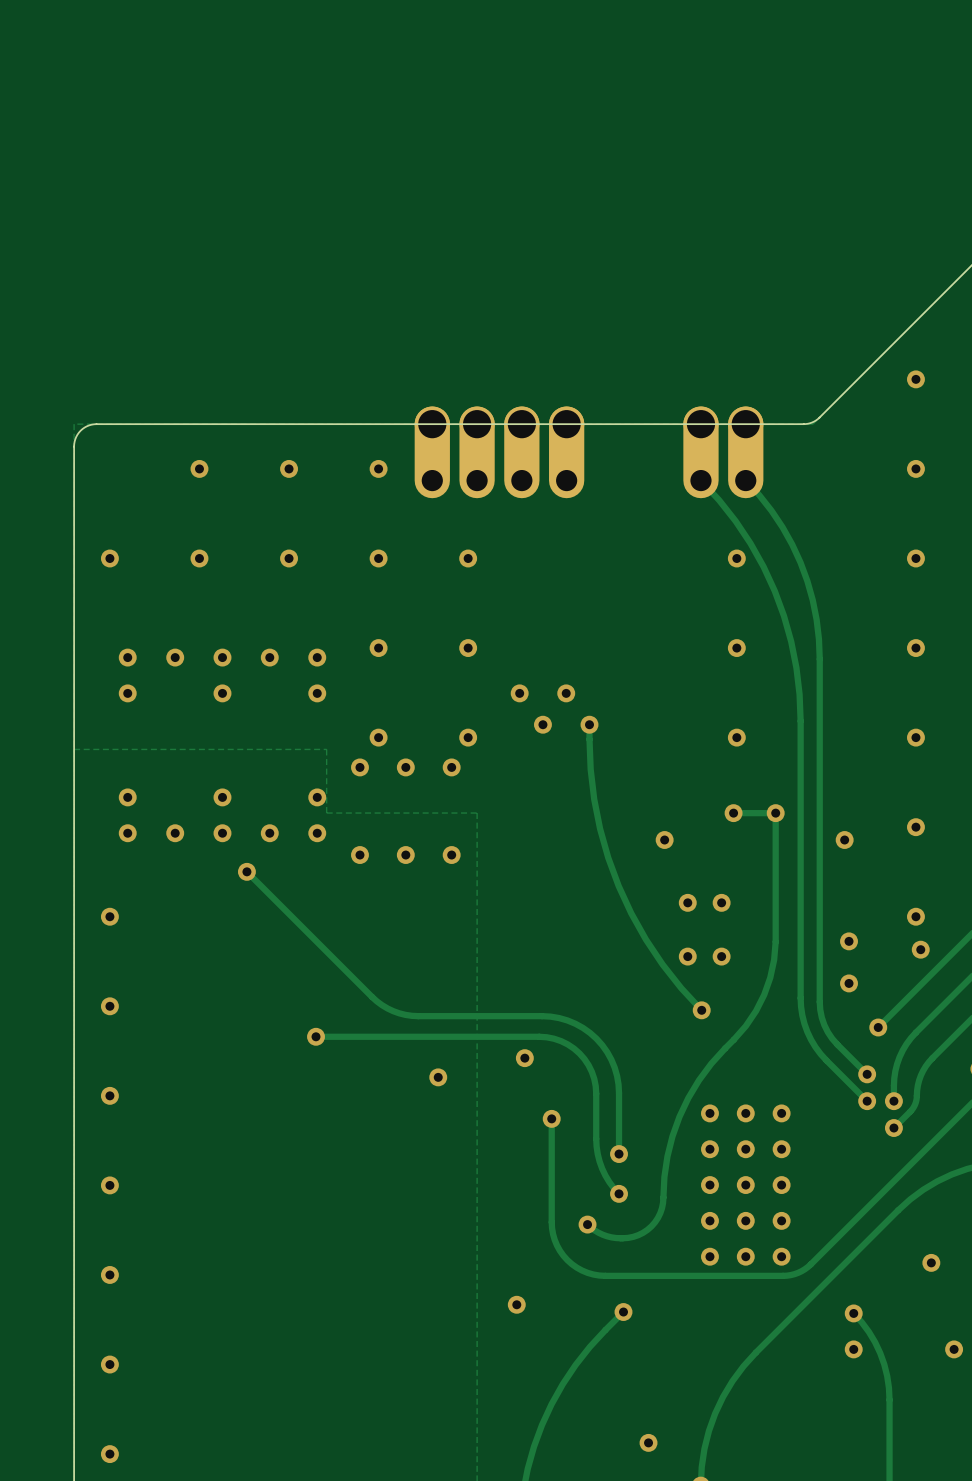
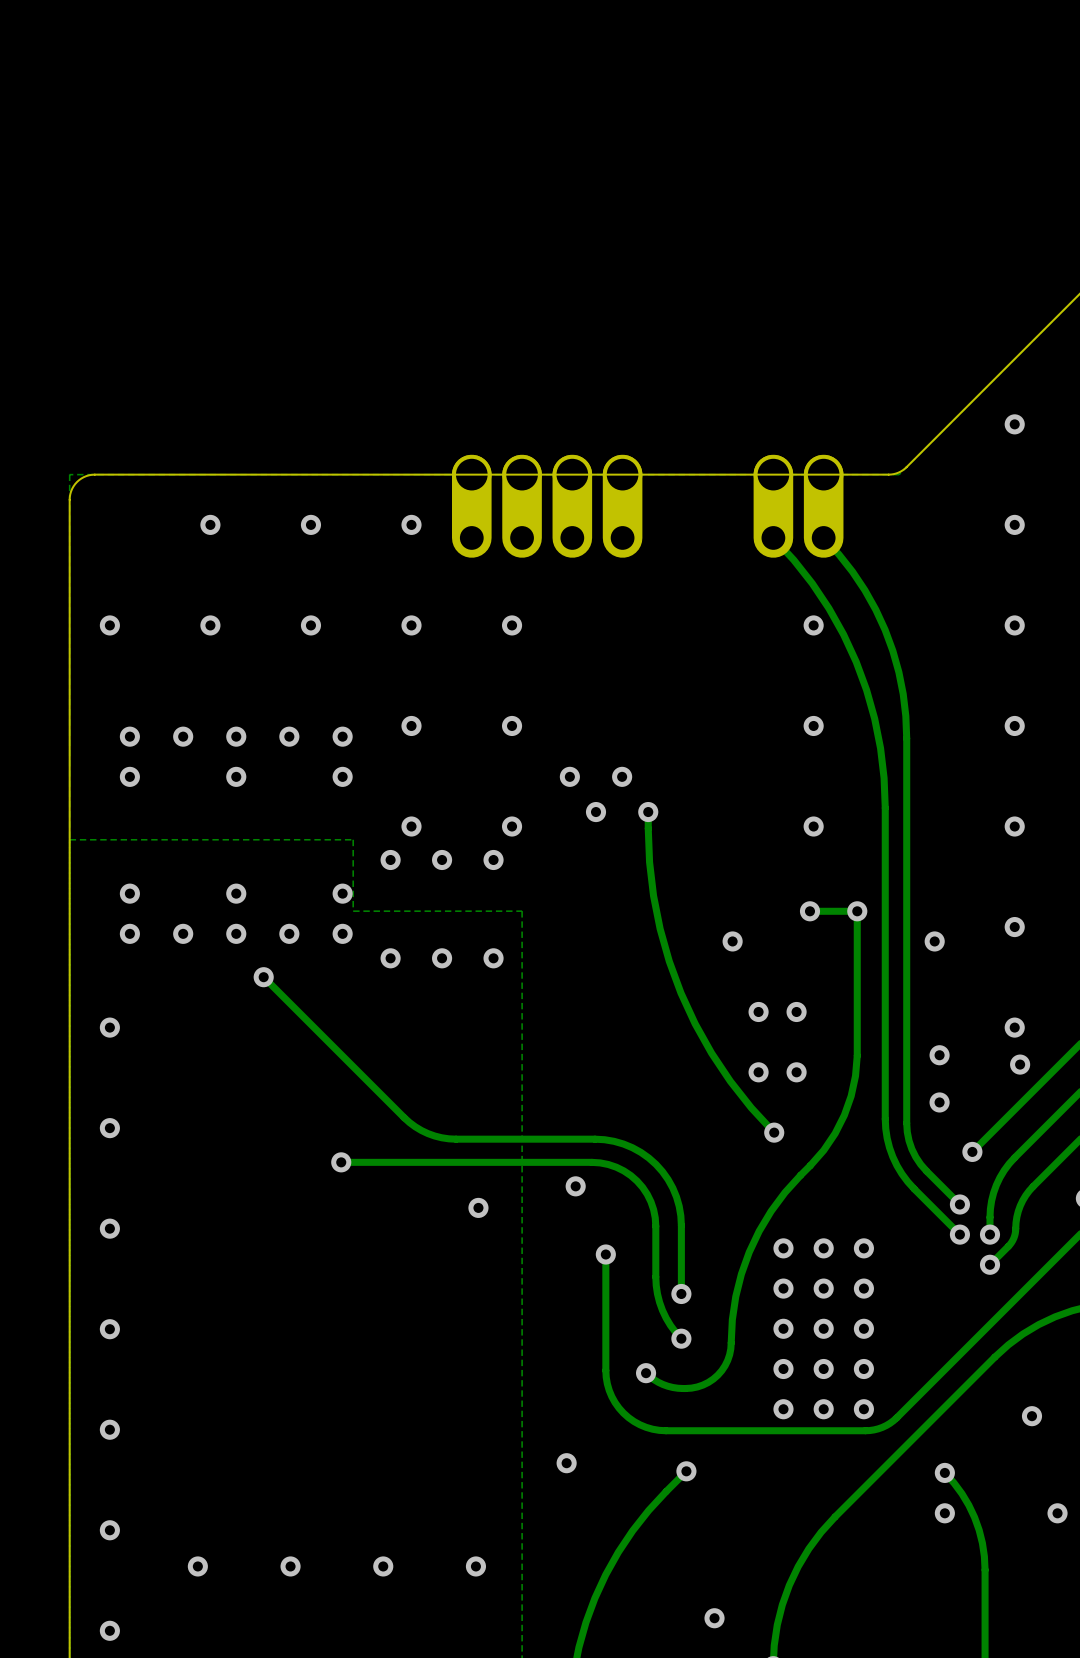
via: none -> (197, 1566)
via: none -> (290, 1566)
via: none -> (383, 1566)
via: none -> (475, 1566)

